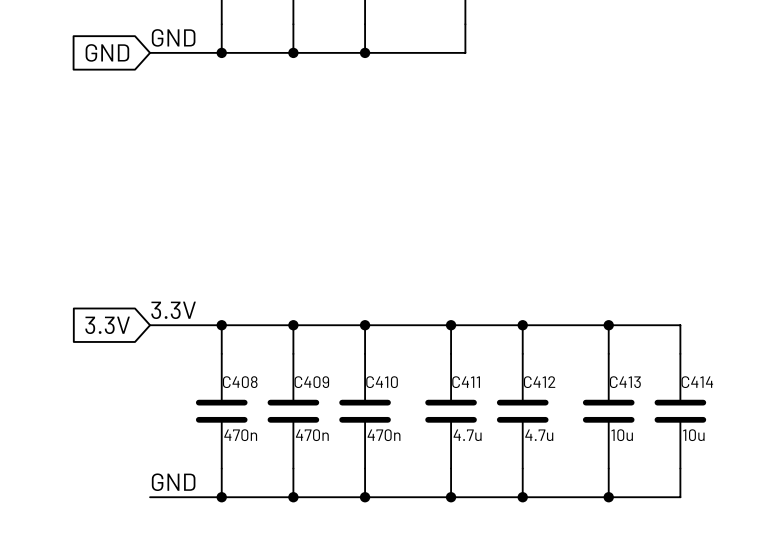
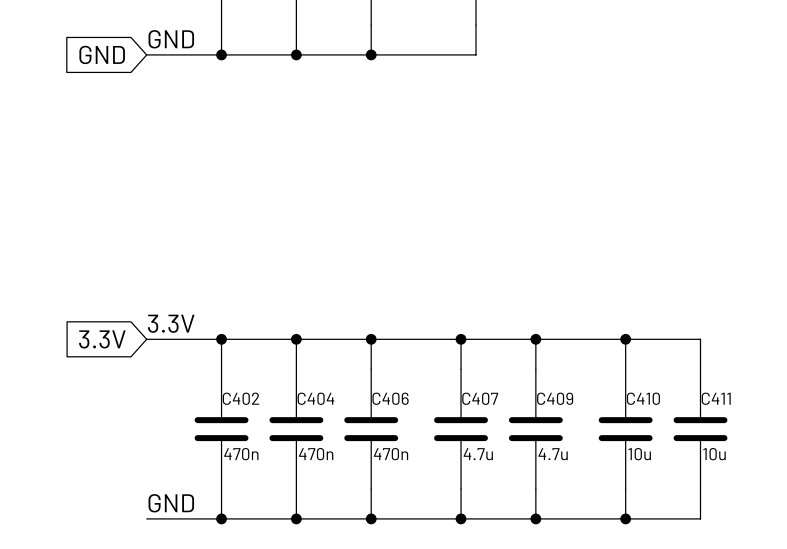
C408 name: C408 (240, 382) -> C402 (240, 398)
C409 name: C409 (311, 382) -> C404 (315, 398)
C410 name: C410 (382, 382) -> C406 (390, 398)
C411 name: C411 (466, 382) -> C407 (480, 398)
C412 name: C412 (539, 382) -> C409 (555, 398)
C413 name: C413 (625, 382) -> C410 (643, 398)
C414 name: C414 (697, 382) -> C411 (716, 398)

